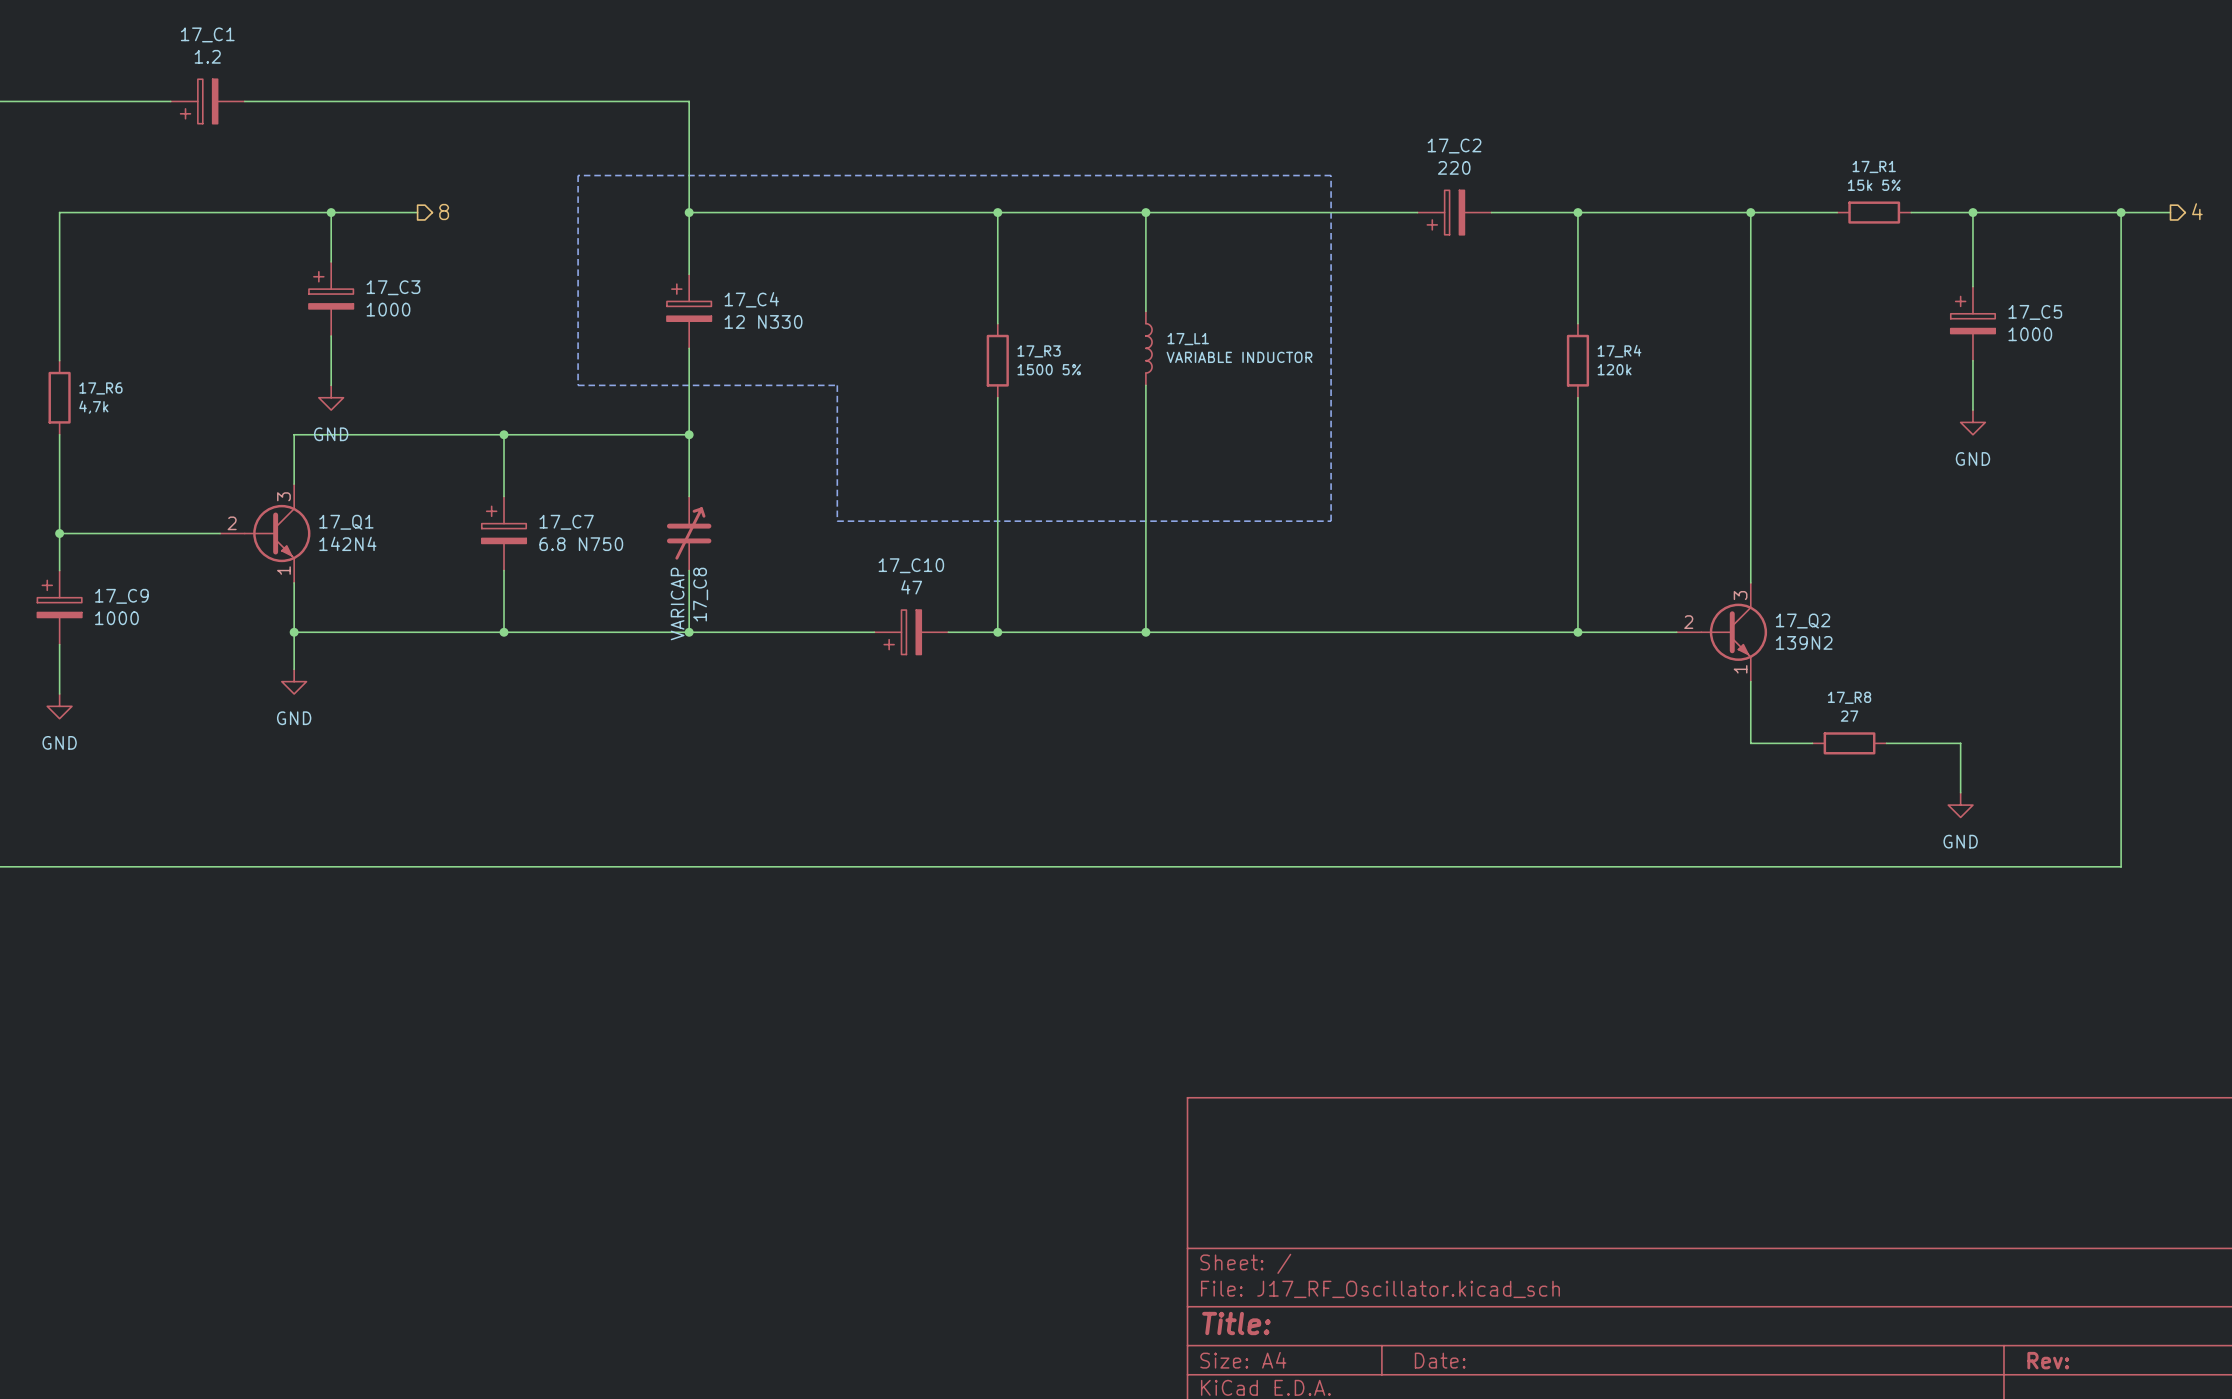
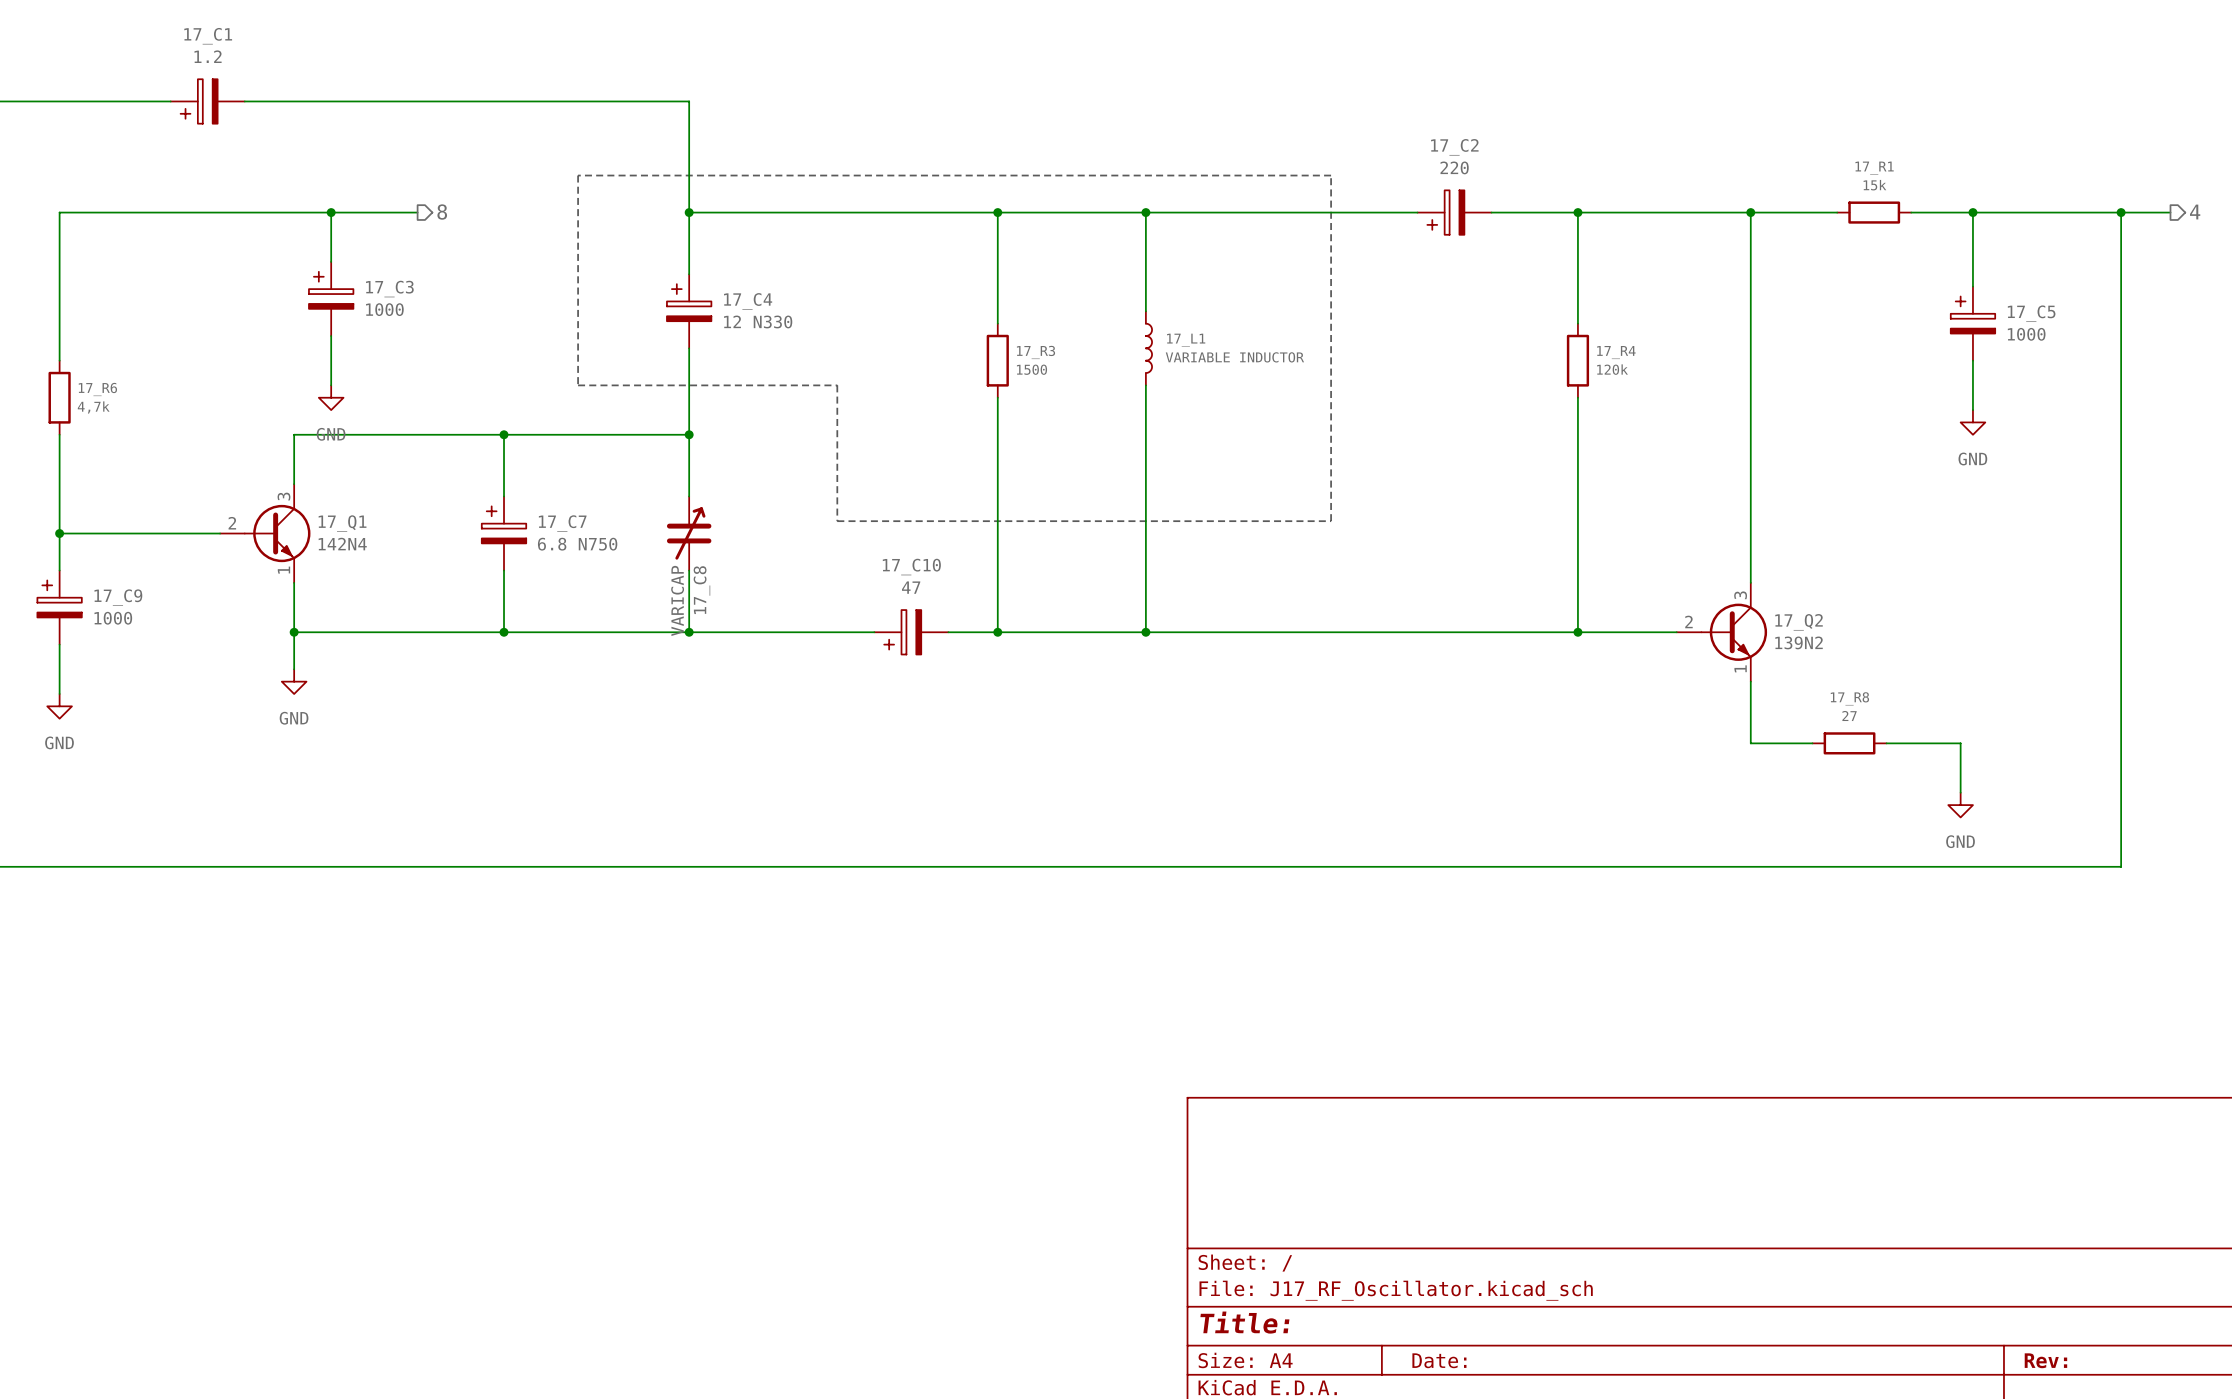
17_R1 value: 15k 5% (1874, 185) -> 15k (1874, 185)
17_R3 value: 1500 5% (1049, 369) -> 1500 (1031, 369)

